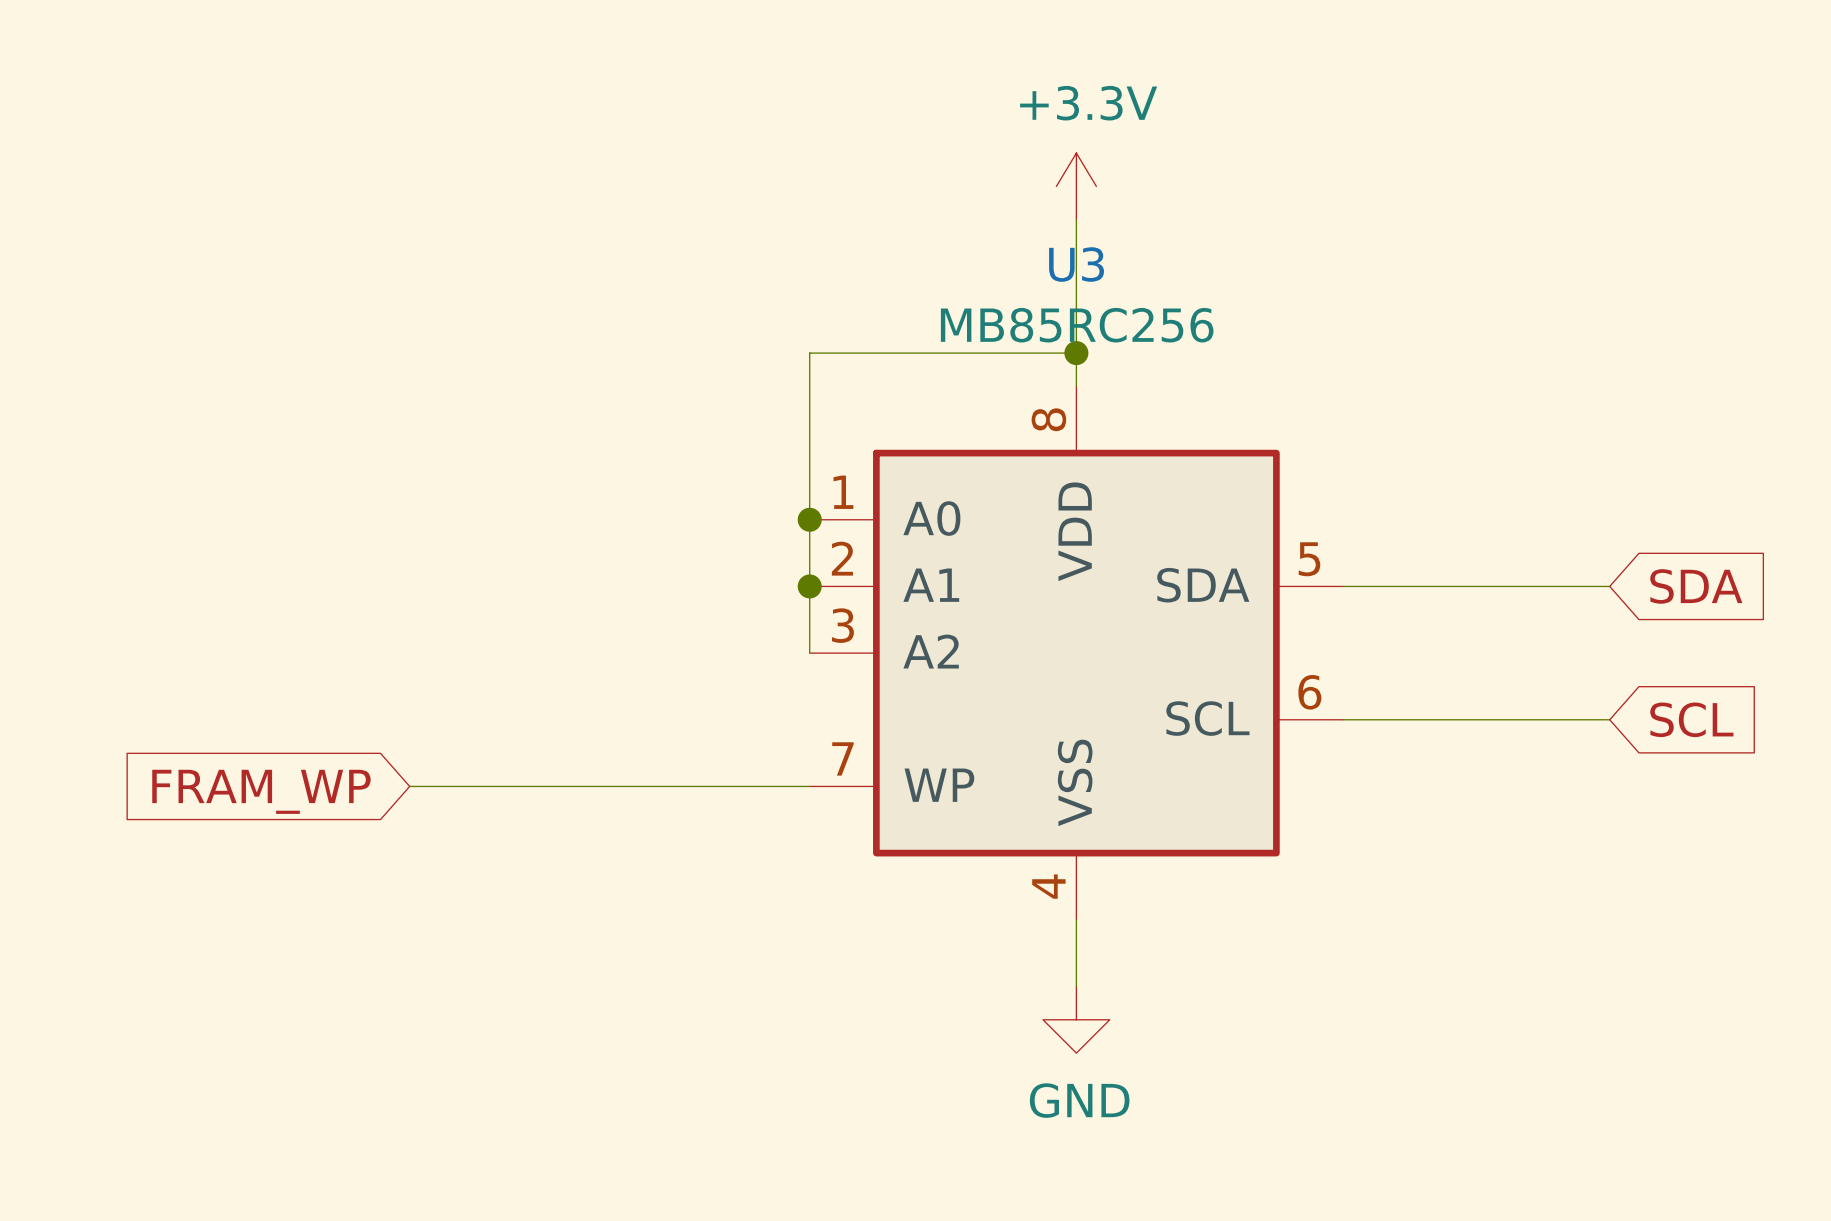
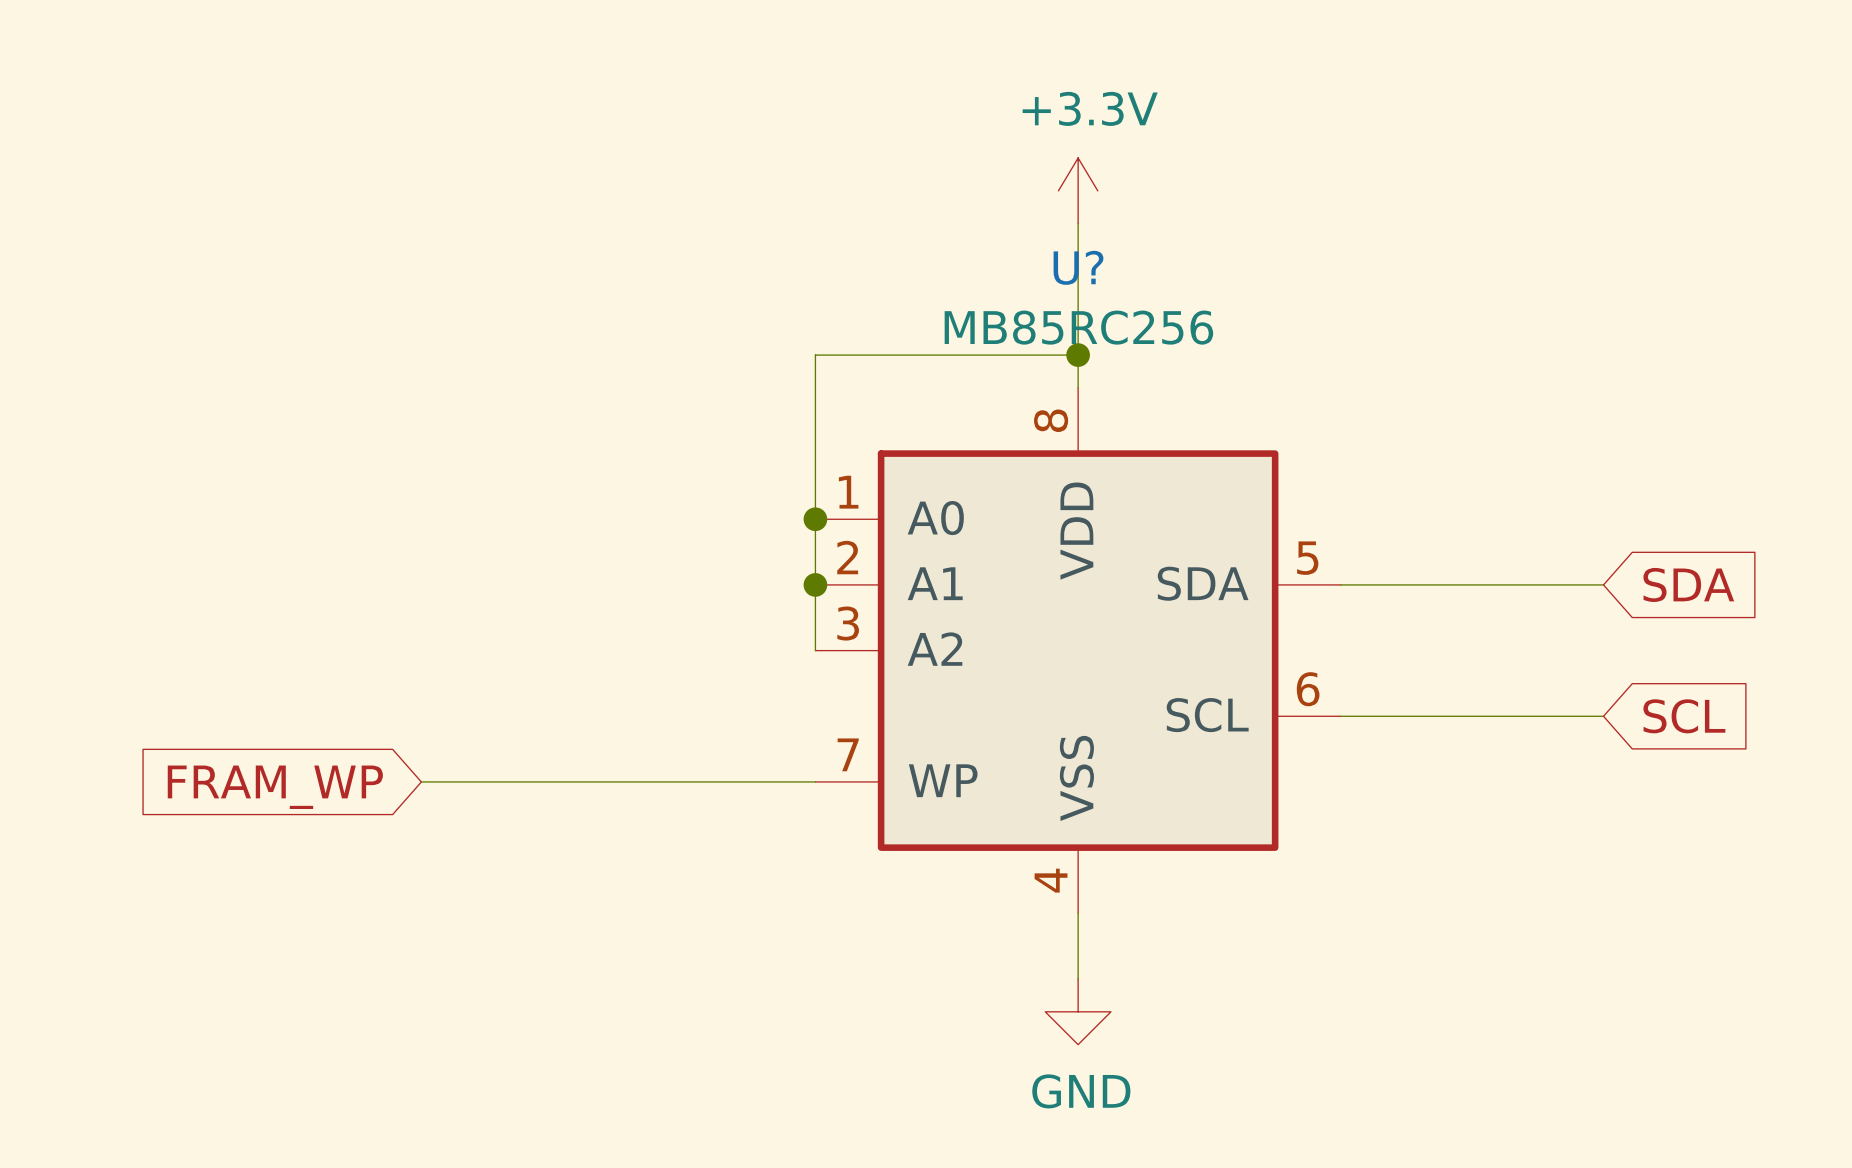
U3 name: U3 (1076, 264) -> U? (1078, 267)

